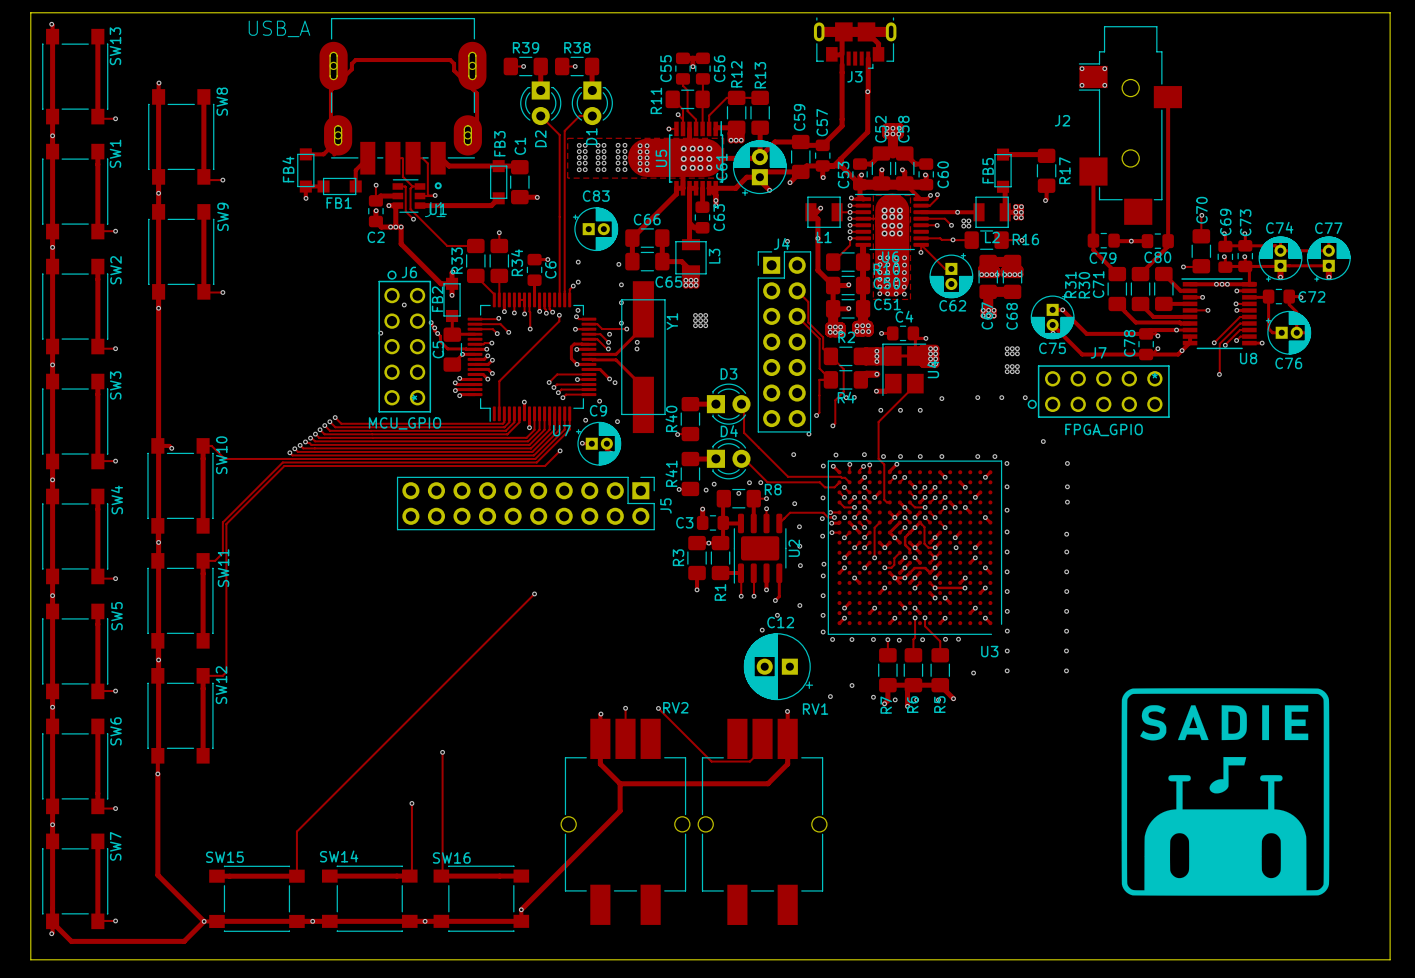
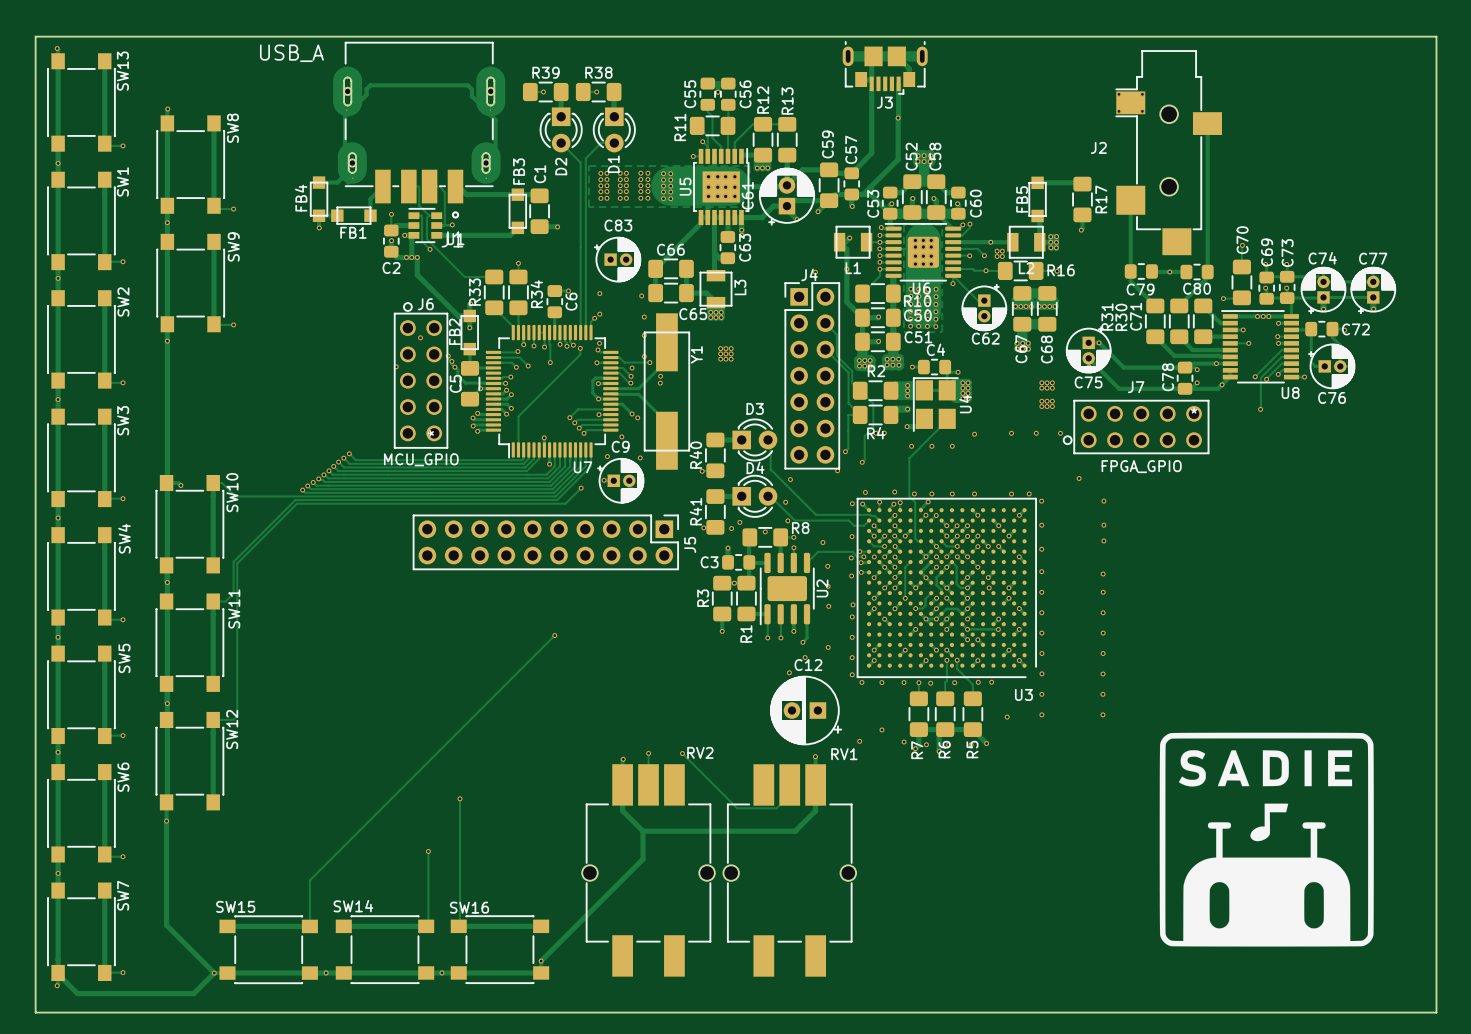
via: none -> (790, 479)
via: (793, 454) -> none
via: none -> (785, 502)
via: (749, 482) -> none

